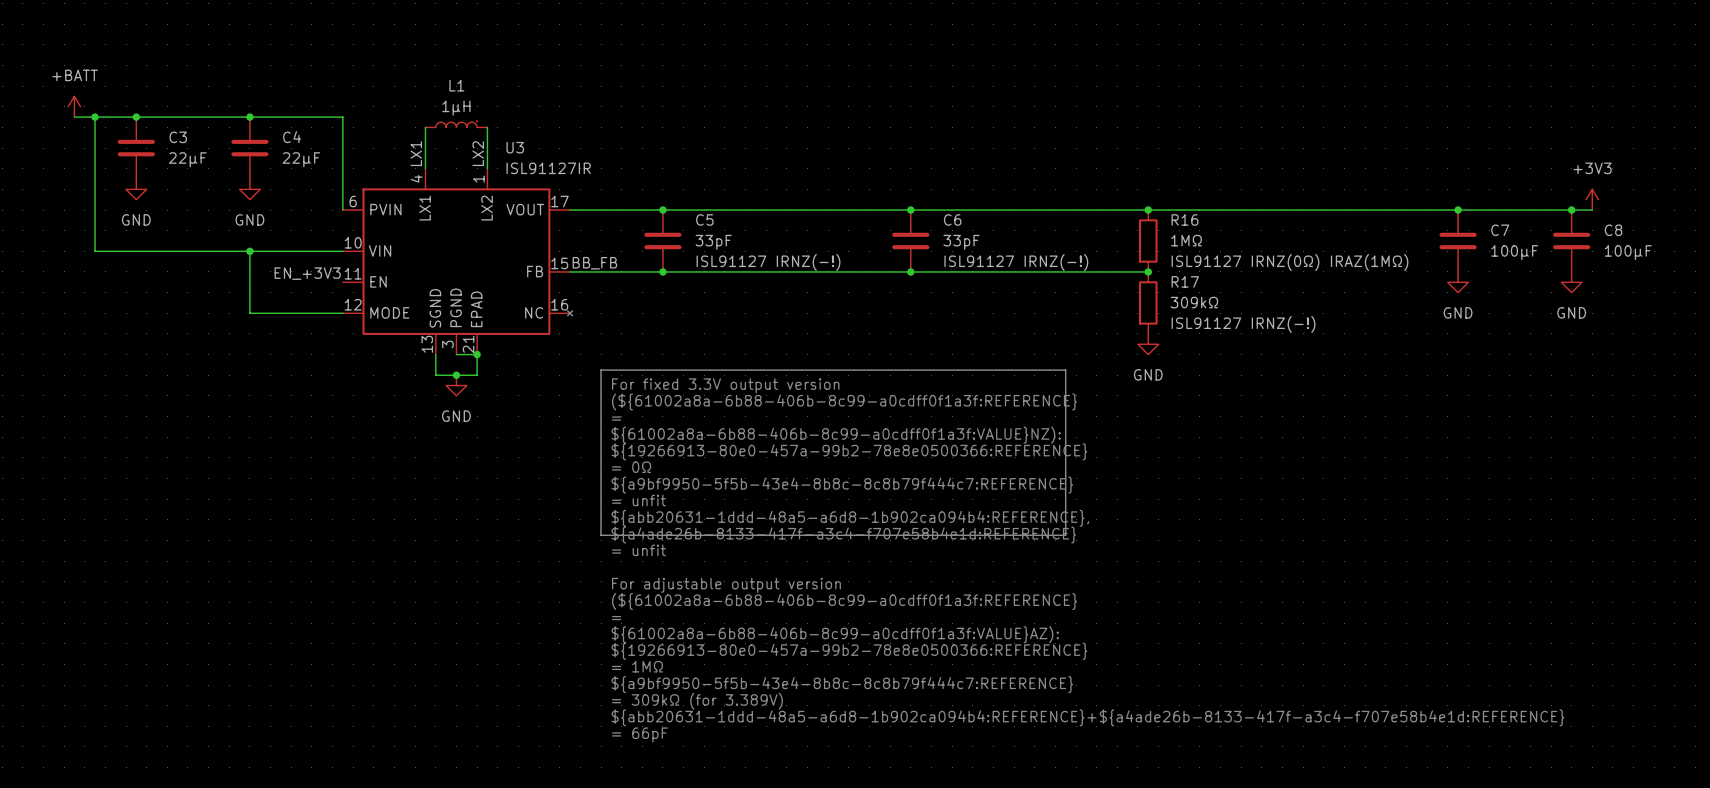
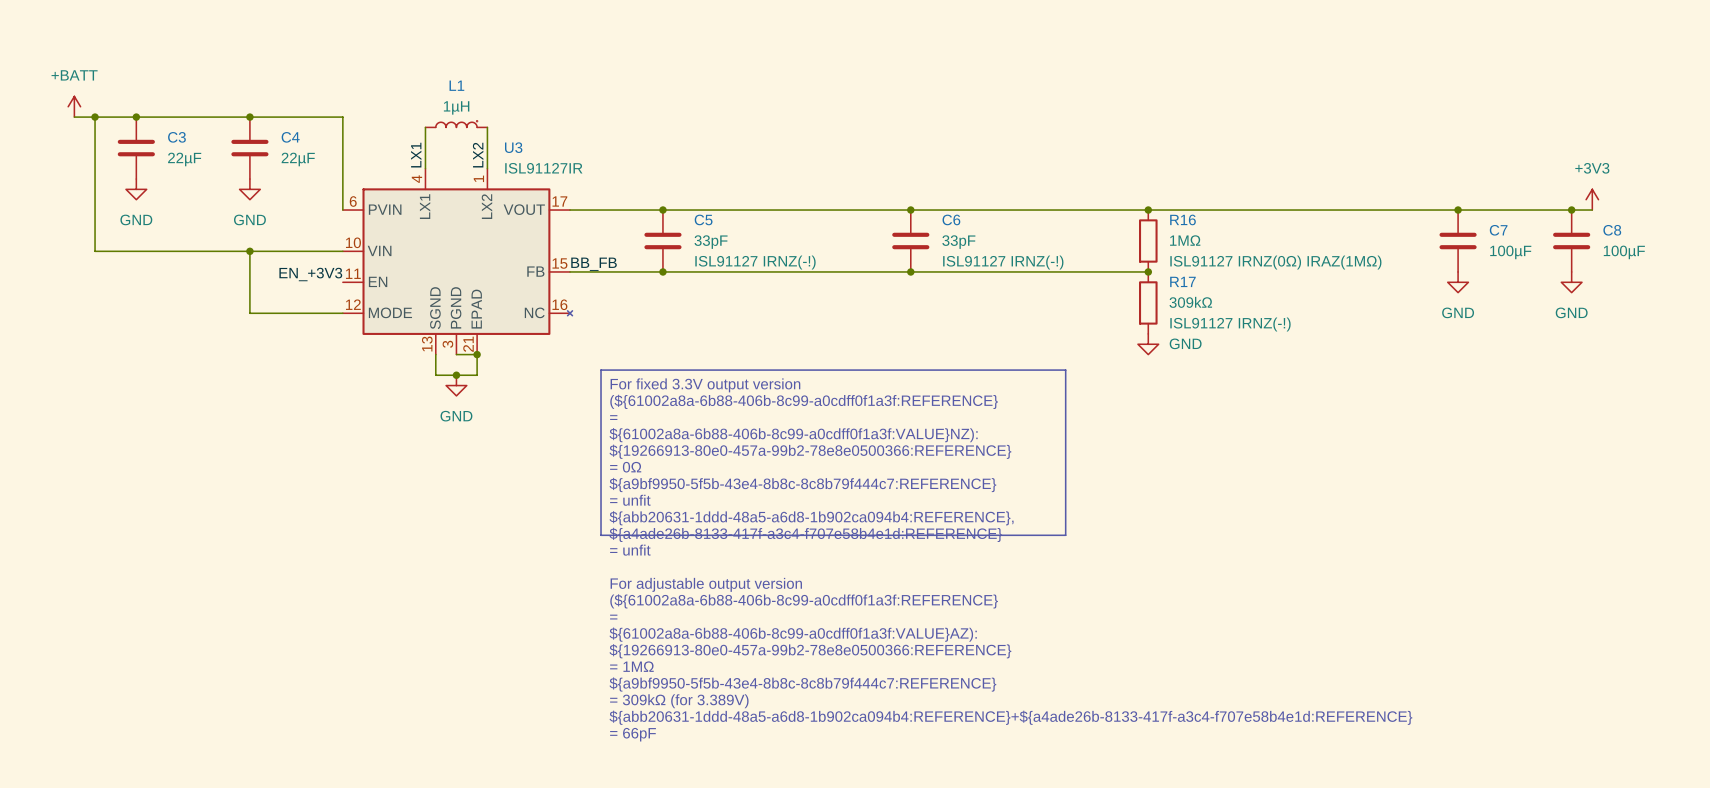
power symbol text position: GND (1148, 374) -> GND (1185, 343)

